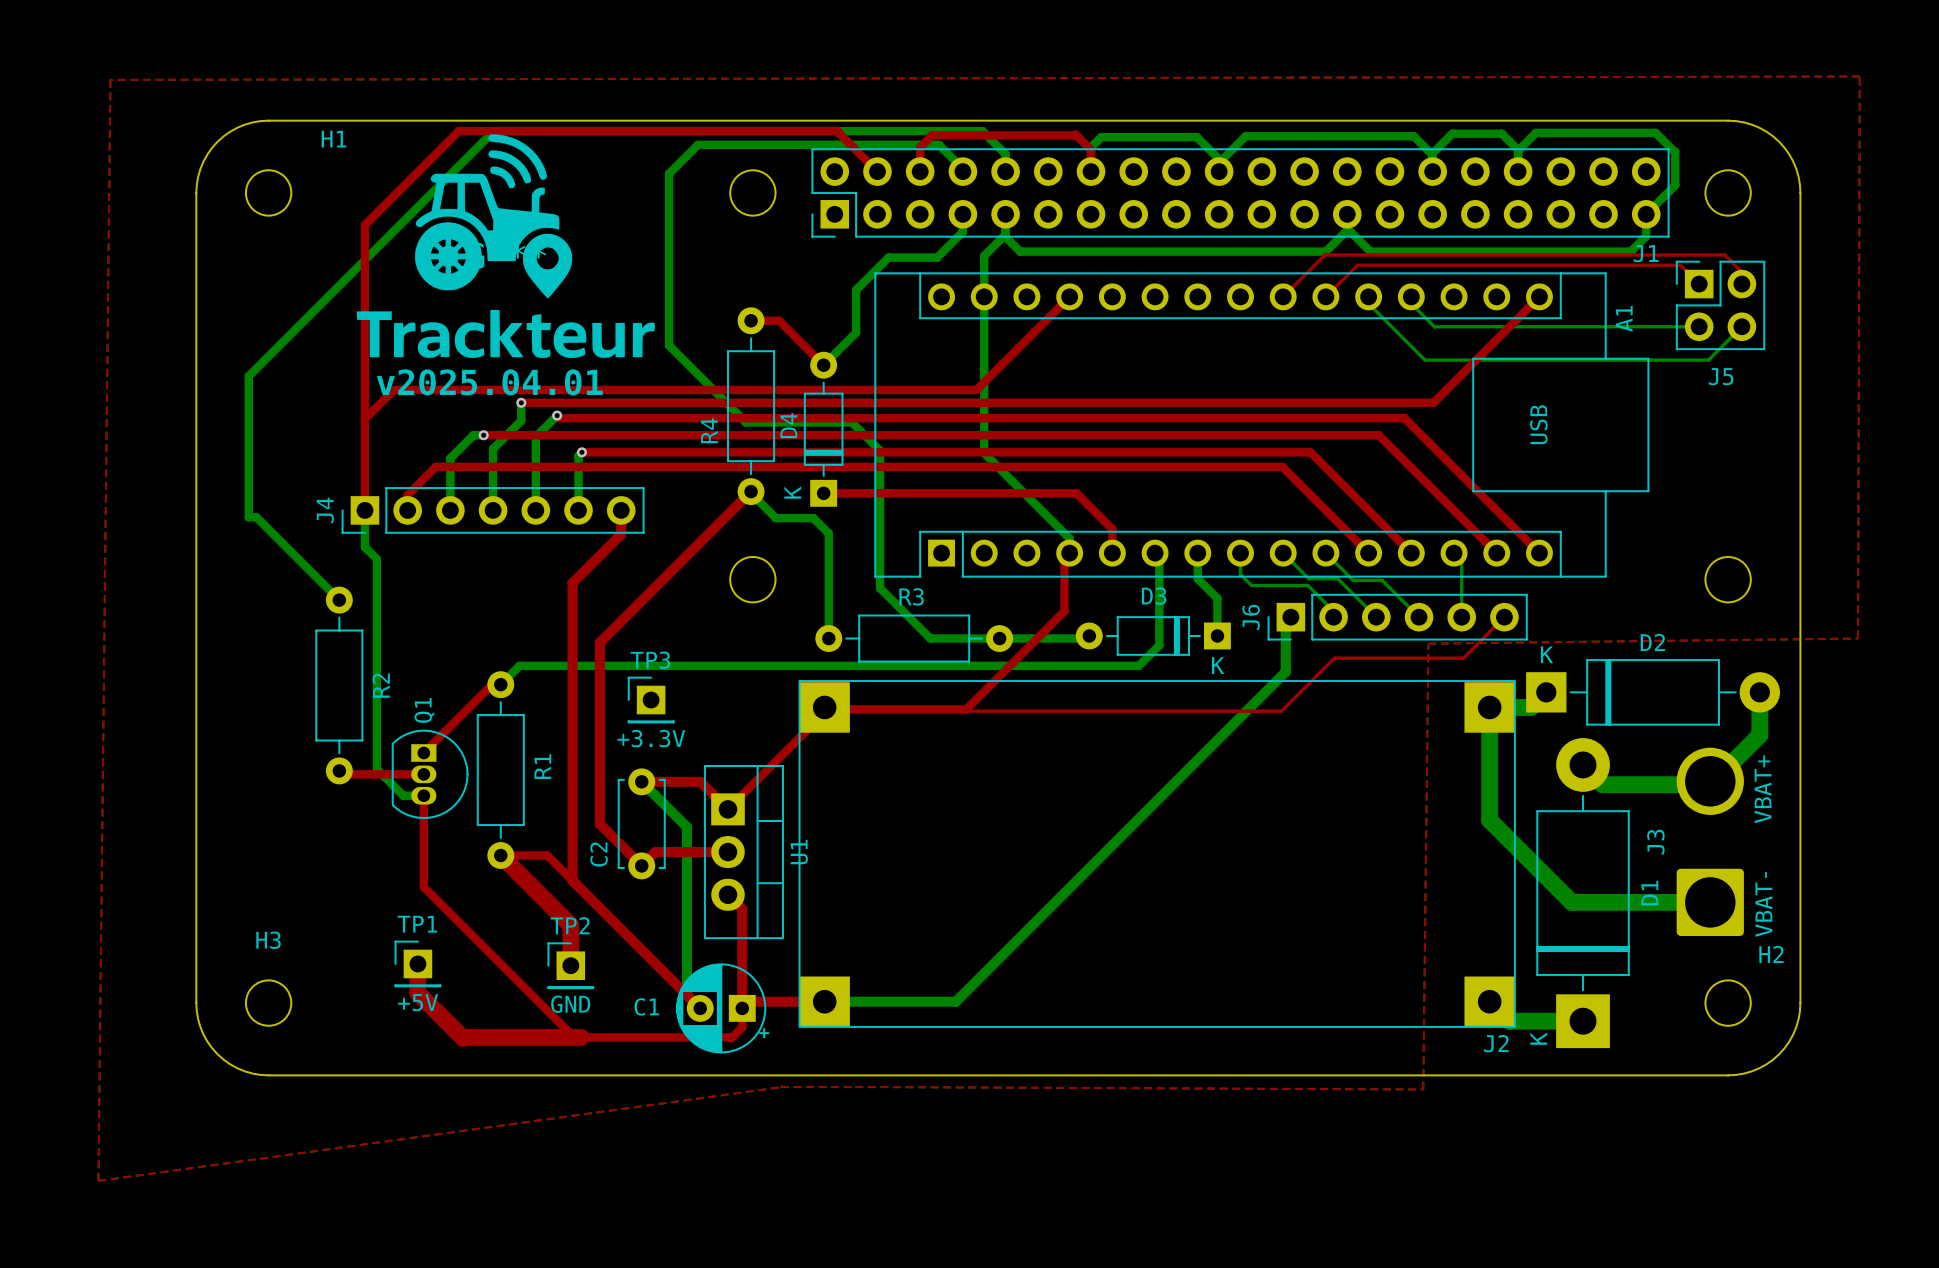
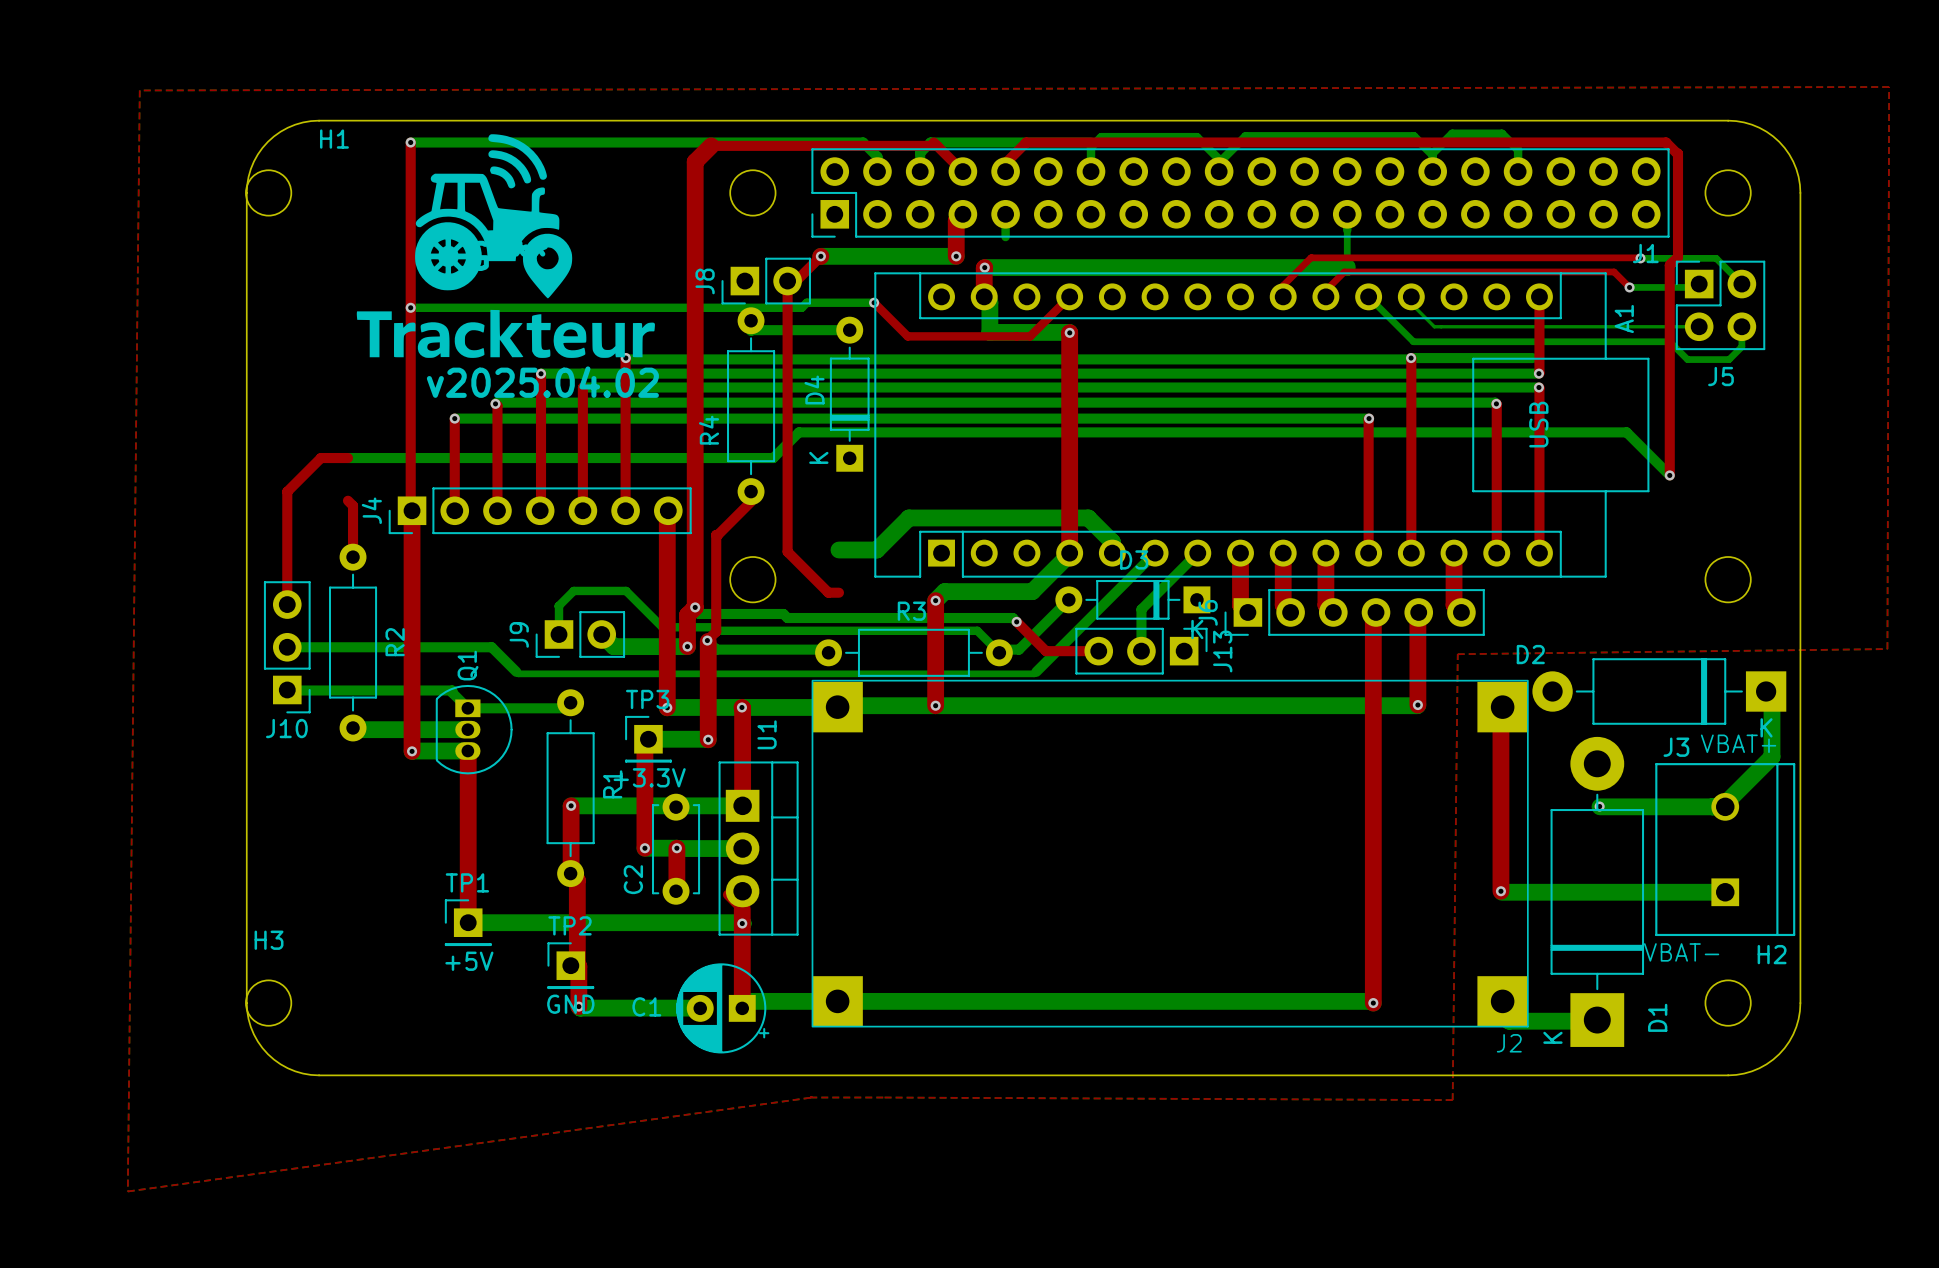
top zone outline: (1859, 76) (1858, 638) (1428, 643) (1423, 1089) (855, 1086) (780, 1086) (782, 1086) (98, 1180) (110, 79) (1859, 76) -> (1889, 87) (1887, 649) (1457, 654) (1452, 1100) (884, 1097) (810, 1097) (812, 1096) (127, 1191) (139, 90) (1889, 87)
board edge: (319, 120) (260, 121) (244, 124) (230, 131) (212, 147) (203, 161) (198, 176) (196, 192) (196, 1011) (200, 1026) (207, 1041) (217, 1054) (237, 1068) (260, 1074) (319, 1075) -> (319, 120) (295, 124) (280, 131) (267, 141) (257, 154) (250, 169) (246, 192) (247, 1011) (253, 1034) (262, 1048) (273, 1059) (295, 1071) (319, 1075)
top track: (839, 132) (837, 131) (458, 131) (364, 225) (364, 510) -> none
top track: (839, 133) (877, 171) -> none
top track: none -> (410, 142) (412, 751)
bottom track: none -> (410, 142) (863, 142) (877, 156) (877, 171)
via: none -> (410, 142)
top track: none -> (933, 142) (962, 171)
bottom track: none -> (1090, 142) (930, 142) (920, 152) (920, 171)
top track: none -> (937, 145) (711, 145) (695, 161) (695, 607) (687, 615) (687, 646)
bottom track: (1518, 150) (1536, 132) (1655, 132) (1675, 151) (1675, 185) (1646, 213) -> none
top track: (920, 171) (920, 147) (932, 135) (1075, 134) (1091, 149) (1091, 171) -> none
bottom track: (962, 171) (962, 168) (938, 144) (698, 144) (669, 173) (669, 345) (745, 422) (851, 422) (880, 450) (880, 588) (930, 638) (1086, 638) (1089, 635) -> none
top track: none -> (1005, 171) (1005, 163) (1026, 142) (1666, 142) (1678, 153) (1678, 257) (1669, 265) (1669, 475)
bottom track: (1005, 171) (1005, 154) (982, 131) (493, 131) (248, 376) (248, 517) (256, 517) (339, 600) -> none
top track: none -> (962, 214) (956, 220) (956, 256)
bottom track: (962, 214) (962, 231) (937, 257) (888, 257) (856, 290) (856, 332) (823, 365) -> none
bottom track: (1646, 214) (1646, 236) (1630, 251) (1370, 251) (1347, 228) -> none
bottom track: (1347, 230) (1325, 251) (1020, 251) (1005, 237) -> (1347, 230) (1346, 267) (984, 267)
bottom track: (1005, 234) (984, 255) (984, 453) (1069, 538) (1069, 553) -> (935, 600) (944, 591) (1032, 591) (1069, 553)
top track: none -> (820, 256) (796, 281) (787, 281) (787, 551) (828, 592) (838, 592)
bottom track: none -> (820, 256) (956, 256)
via: none -> (820, 256)
via: none -> (956, 256)
bottom track: none -> (1640, 258) (1716, 258) (1741, 284)
via: none -> (1640, 258)
top track: none -> (984, 267) (984, 296)
via: none -> (984, 267)
J8: none -> (766, 281)
top track: (1699, 284) (1680, 265) (1357, 265) (1325, 296) -> (1629, 287) (1614, 271) (1344, 271) (1325, 290) (1325, 296)
bottom track: none -> (1699, 284) (1695, 287) (1629, 287)
top track: (1741, 284) (1741, 272) (1724, 255) (1325, 255) (1283, 296) -> (1640, 258) (1310, 257) (1283, 285) (1283, 296)
via: none -> (1629, 287)
bottom track: none -> (984, 296) (989, 302) (989, 332) (1069, 332)
bottom track: (1368, 296) (1368, 303) (1425, 360) (1708, 360) (1741, 326) -> (1368, 296) (1413, 341) (1669, 341) (1687, 359) (1729, 359) (1741, 346) (1741, 326)
top track: (1539, 296) (1433, 402) (521, 402) -> (1539, 296) (1538, 373)
bottom track: none -> (874, 302) (806, 302) (801, 307) (410, 307)
via: none -> (874, 302)
via: none -> (410, 307)
top track: (751, 320) (779, 320) (823, 365) -> none
bottom track: none -> (849, 330) (751, 330)
top track: none -> (1069, 332) (1069, 553)
via: none -> (1069, 332)
top track: (1030, 336) (976, 389) (394, 389) (364, 419) -> (1030, 336) (907, 336) (874, 302)
top track: none -> (625, 358) (625, 510)
bottom track: none -> (625, 358) (1532, 358)
via: none -> (625, 358)
via: none -> (1411, 358)
top track: none -> (541, 373) (540, 510)
bottom track: none -> (541, 373) (1538, 373)
via: none -> (541, 373)
via: none -> (1538, 373)
text: v2025.04.01 (489, 382) -> v2025.04.02 (542, 382)
top track: none -> (582, 387) (582, 510)
bottom track: none -> (583, 387) (1538, 387)
via: none -> (1538, 387)
bottom track: (521, 402) (521, 420) (493, 448) (493, 510) -> none
via: (521, 402) -> none
top track: none -> (495, 403) (497, 405) (497, 510)
bottom track: none -> (495, 403) (1496, 403)
via: none -> (495, 403)
via: none -> (1496, 403)
top track: (557, 415) (559, 418) (1404, 418) (1539, 553) -> (1538, 387) (1539, 553)
bottom track: (557, 415) (535, 436) (535, 510) -> none
via: (557, 415) -> none
top track: none -> (454, 418) (454, 510)
bottom track: none -> (454, 418) (1369, 418)
via: none -> (454, 418)
via: none -> (1369, 418)
D4 position: (823, 429) -> (849, 394)
top track: (483, 435) (1378, 435) (1496, 553) -> (1496, 403) (1496, 553)
bottom track: (483, 435) (473, 435) (450, 458) (450, 510) -> none
via: (483, 435) -> none
top track: (581, 452) (1310, 452) (1411, 553) -> (1411, 358) (1411, 553)
bottom track: (581, 452) (578, 455) (578, 510) -> none
via: (581, 452) -> none
top track: none -> (347, 458) (321, 458) (287, 491) (287, 604)
bottom track: none -> (347, 458) (773, 458) (798, 432) (1626, 432) (1669, 475)
via: none -> (1669, 475)
top track: (751, 491) (599, 642) (599, 824) (641, 865) (655, 852) (727, 852) -> none
bottom track: (751, 491) (775, 518) (813, 518) (828, 533) (828, 638) -> none
top track: (823, 493) (1076, 493) (1112, 529) (1112, 553) -> none
top track: none -> (347, 500) (353, 505) (353, 557)
top track: none -> (751, 501) (716, 534) (716, 631) (707, 640) (708, 739)
bottom track: (364, 510) (364, 547) (376, 559) (376, 769) (403, 795) (423, 795) -> none
top track: (407, 510) (407, 495) (435, 466) (1282, 466) (1368, 553) -> (1369, 418) (1368, 553)
J4 position: (493, 510) -> (540, 510)
top track: (621, 510) (621, 534) (572, 583) (572, 880) (700, 1008) -> none
top track: none -> (668, 510) (667, 707)
bottom track: none -> (838, 550) (876, 550) (908, 517) (1088, 517) (1112, 542) (1112, 553)
bottom track: (1155, 553) (1159, 557) (1159, 645) (1138, 665) (519, 665) (500, 684) -> (1155, 553) (1034, 673) (518, 673) (491, 647) (287, 647)
bottom track: (1197, 553) (1197, 578) (1217, 598) (1217, 635) -> (1197, 553) (1141, 609) (1141, 651)
top track: none -> (1240, 553) (1240, 605) (1247, 612)
bottom track: (1240, 553) (1240, 574) (1251, 585) (1307, 585) (1333, 611) (1333, 617) -> none
top track: none -> (1283, 553) (1283, 605) (1290, 612)
bottom track: (1283, 553) (1308, 578) (1337, 578) (1376, 617) -> none
top track: none -> (1325, 553) (1325, 605) (1333, 612)
bottom track: (1325, 553) (1353, 580) (1382, 580) (1419, 617) -> none
top track: none -> (1454, 553) (1454, 605) (1461, 612)
bottom track: (1454, 553) (1461, 560) (1461, 617) -> none
top track: (1068, 554) (1064, 558) (1064, 611) (966, 709) (826, 709) -> none
bottom track: none -> (1068, 599) (1019, 649) (999, 649)
top track: none -> (935, 600) (935, 705)
via: none -> (935, 600)
via: none -> (695, 607)
bottom track: none -> (693, 608) (699, 613) (783, 613) (787, 618) (1012, 618) (1016, 621)
top track: none -> (1376, 612) (1373, 615) (1373, 1003)
top track: none -> (1418, 612) (1417, 705)
bottom track: (1290, 617) (1285, 622) (1285, 671) (955, 1001) (824, 1001) -> none
J6 position: (1397, 617) -> (1354, 612)
top track: (1504, 617) (1463, 658) (1334, 658) (1281, 711) (828, 711) (824, 707) (826, 709) -> none
top track: none -> (1016, 621) (1045, 651) (1098, 651)
via: none -> (1016, 621)
bottom track: none -> (559, 634) (558, 606) (573, 590) (626, 590) (662, 627) (715, 627) (719, 630) (977, 630) (999, 652)
J9: none -> (580, 634)
bottom track: none -> (601, 634) (613, 646) (687, 646)
D3 position: (1153, 635) -> (1132, 599)
R3 position: (914, 638) -> (913, 652)
bottom track: none -> (707, 640) (716, 649) (828, 649)
via: none -> (707, 640)
D2 name position: D2 (1652, 642) -> D2 (1530, 654)
via: none -> (687, 646)
J10: none -> (287, 647)
J13: none -> (1141, 651)
top track: (500, 684) (492, 684) (423, 752) -> none
R2 position: (339, 685) -> (353, 642)
bottom track: none -> (287, 689) (452, 690) (467, 708) (565, 708) (570, 702)
bottom track: none -> (1772, 691) (1772, 756) (1722, 806)
bottom track: (1546, 692) (1531, 707) (1489, 707) (1489, 820) (1571, 902) (1710, 902) -> none
D2 rotation: 0° (1653, 692) -> 180° (1659, 691)
bottom track: (1759, 692) (1759, 735) (1710, 784) (1602, 784) (1583, 764) -> none
TP3 position: (651, 700) -> (648, 739)
via: none -> (935, 705)
bottom track: none -> (1417, 705) (667, 707)
via: none -> (1417, 705)
via: none -> (667, 707)
top track: none -> (741, 707) (742, 805)
via: none -> (741, 707)
top track: none -> (1502, 707) (1500, 708) (1500, 891)
top track: (826, 709) (727, 809) (700, 781) (641, 781) -> none
bottom track: none -> (353, 727) (354, 729) (467, 729)
top track: none -> (648, 739) (644, 742) (644, 848)
bottom track: none -> (648, 739) (708, 739)
via: none -> (708, 739)
J3 footprint: [1676, 747, 1744, 937] -> [1655, 763, 1796, 937]
via: none -> (412, 751)
top track: none -> (467, 751) (468, 922)
bottom track: none -> (467, 751) (412, 751)
top track: (339, 770) (342, 774) (423, 774) -> none
R1 position: (500, 770) -> (570, 788)
Q1 position: (430, 774) -> (474, 729)
bottom track: (642, 779) (641, 781) (686, 827) (686, 995) (700, 1008) -> (578, 1006) (700, 1008)
text rotation: 0° (1763, 789) -> 90° clockwise (1738, 743)
top track: (423, 795) (423, 887) (574, 1037) (731, 1038) (742, 1027) (742, 1008) (748, 1001) (824, 1001) -> none
top track: none -> (571, 805) (570, 873) (577, 880) (578, 1006)
bottom track: none -> (571, 805) (742, 805)
via: none -> (571, 805)
bottom track: none -> (1599, 806) (1725, 806)
via: none -> (1599, 806)
C2 position: (641, 823) -> (676, 849)
J3 name position: J3 (1655, 842) -> J3 (1676, 747)
bottom track: none -> (644, 848) (742, 848)
via: none -> (644, 848)
top track: none -> (676, 848) (676, 891)
via: none -> (676, 848)
U1 position: (743, 852) -> (758, 848)
U1 name position: U1 (799, 852) -> U1 (767, 734)
J2 position: (1157, 853) -> (1170, 853)
top track: (576, 884) (547, 855) (500, 855) (570, 925) (570, 965) -> none
bottom track: none -> (1500, 891) (1725, 892)
via: none -> (1500, 891)
D1 position: (1583, 893) -> (1597, 891)
D1 name position: D1 (1649, 893) -> D1 (1657, 1017)
text rotation: 0° (1763, 904) -> 90° clockwise (1681, 952)
text position: VBAT- (1763, 904) -> VBAT- (1681, 952)
top track width: thin (742, 909) (742, 1008) -> thick (742, 909) (742, 1008)
bottom track: none -> (468, 922) (742, 923)
via: none -> (742, 923)
top track: (417, 963) (417, 993) (463, 1038) (581, 1037) -> none
TP1 position: (417, 963) -> (468, 922)
bottom track: none -> (1373, 1003) (1371, 1001) (749, 1001) (742, 1008)
via: none -> (1373, 1003)
via: none -> (578, 1006)

